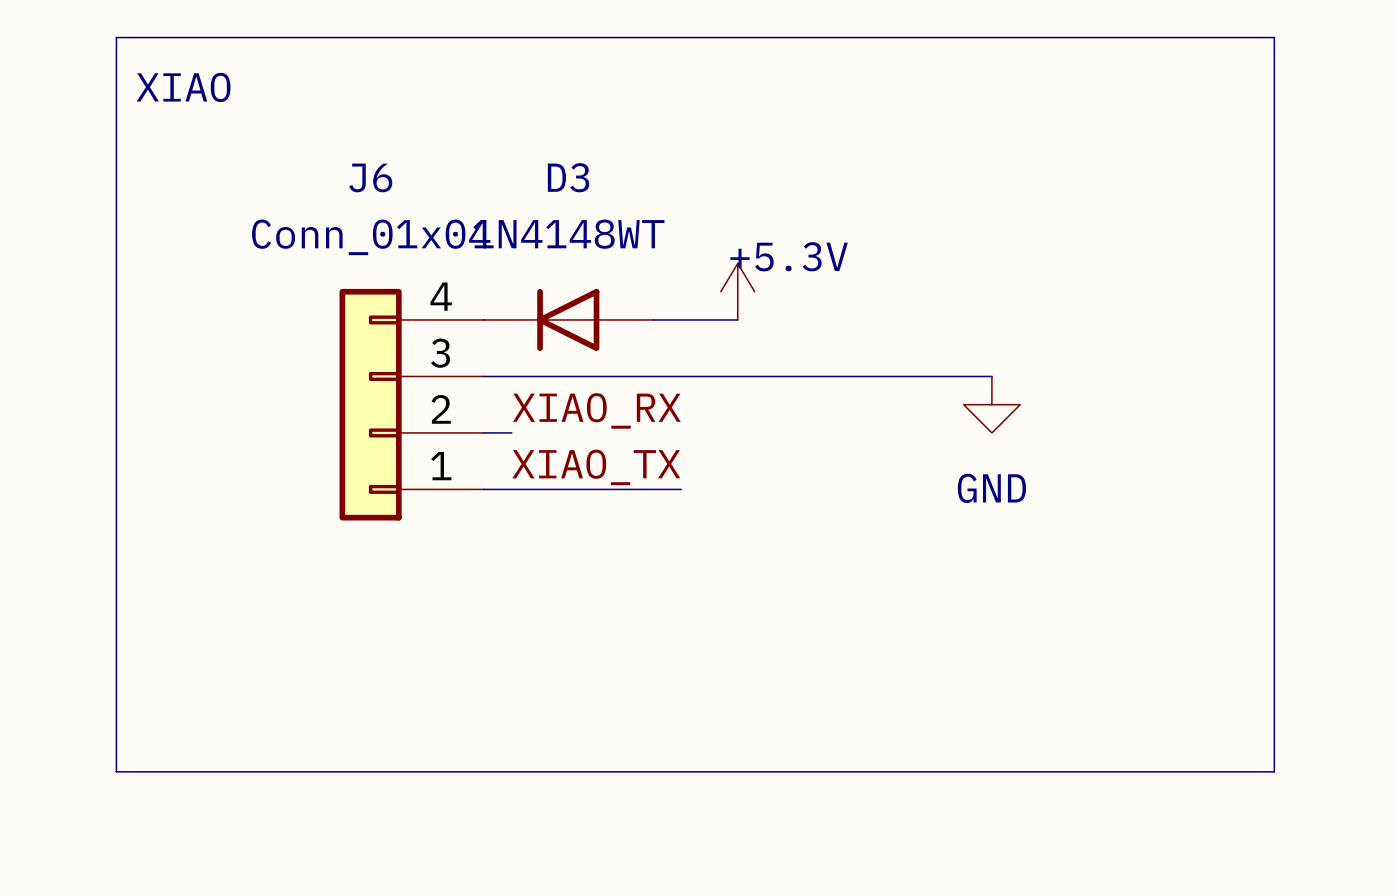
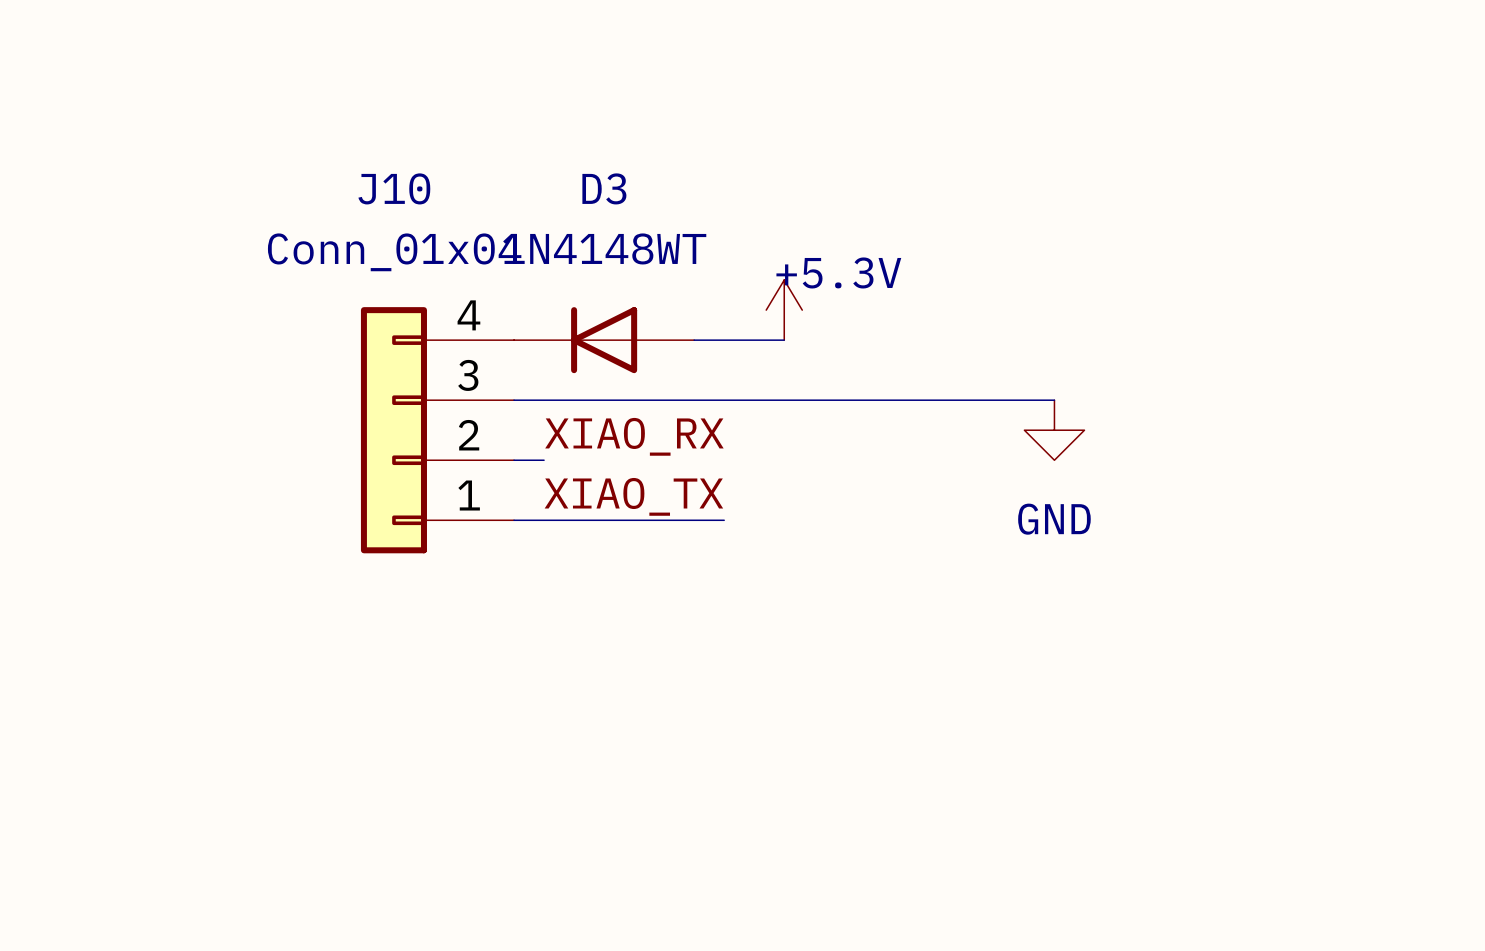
line: (116, 37) (1274, 37) (1274, 771) (116, 771) (116, 37) -> none
text: XIAO (183, 87) -> none
J6 name: J6 (370, 177) -> J10 (394, 188)

